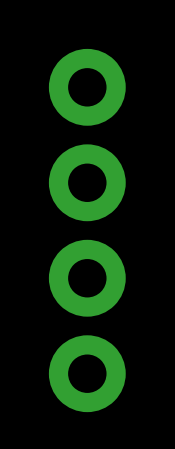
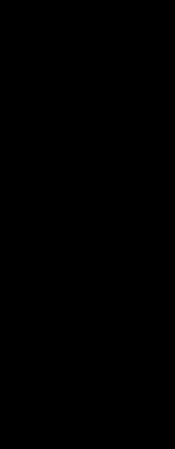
part: (87, 87) -> none
part: (87, 182) -> none
part: (87, 278) -> none
part: (87, 373) -> none

